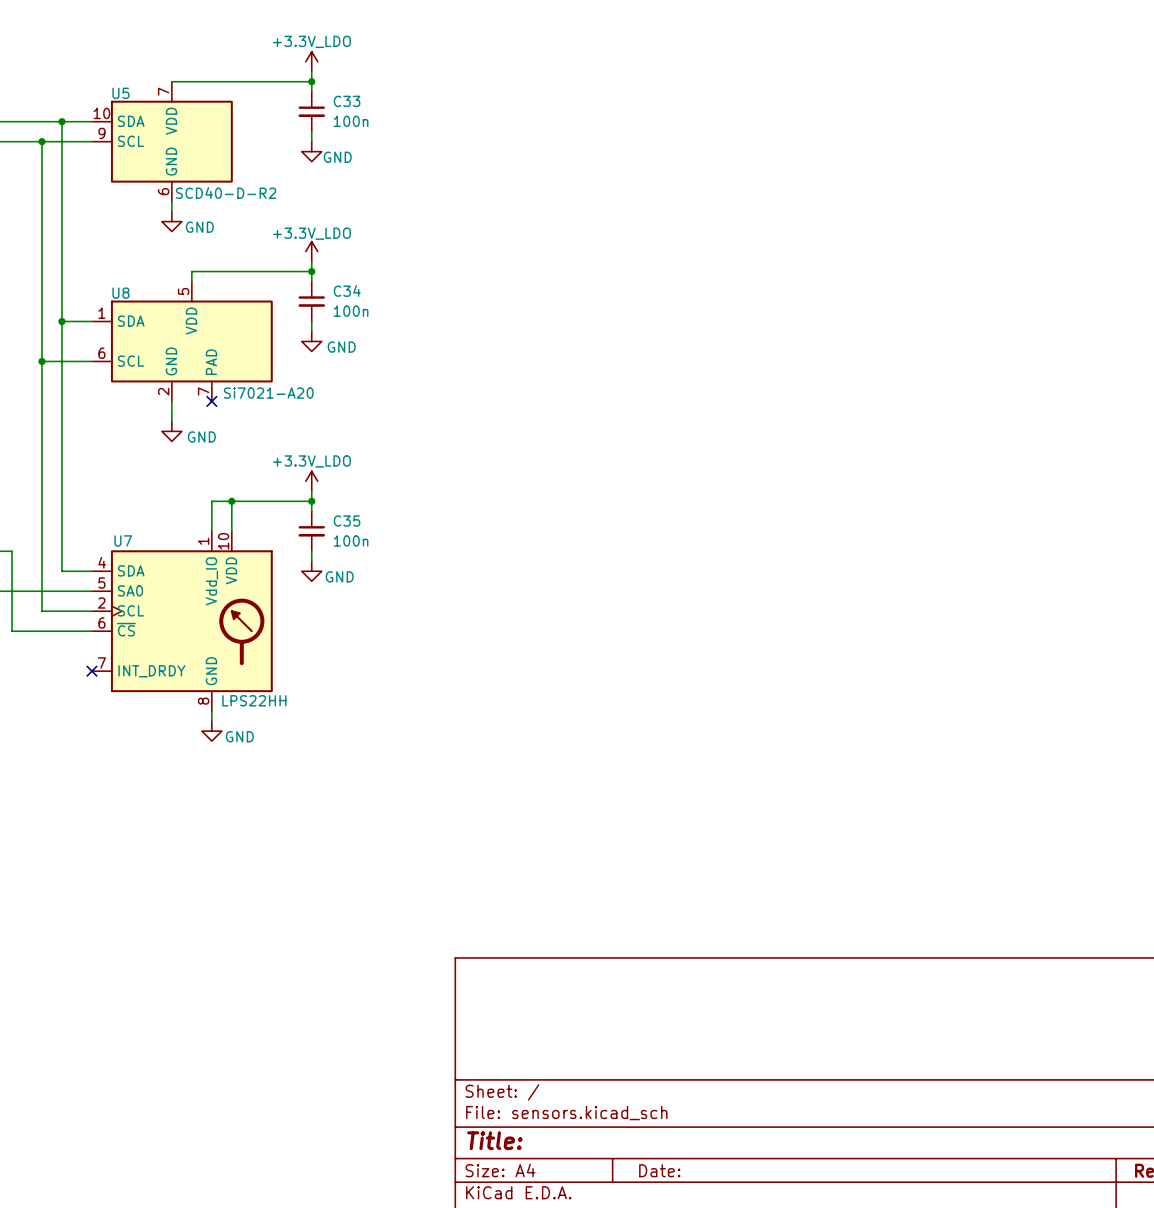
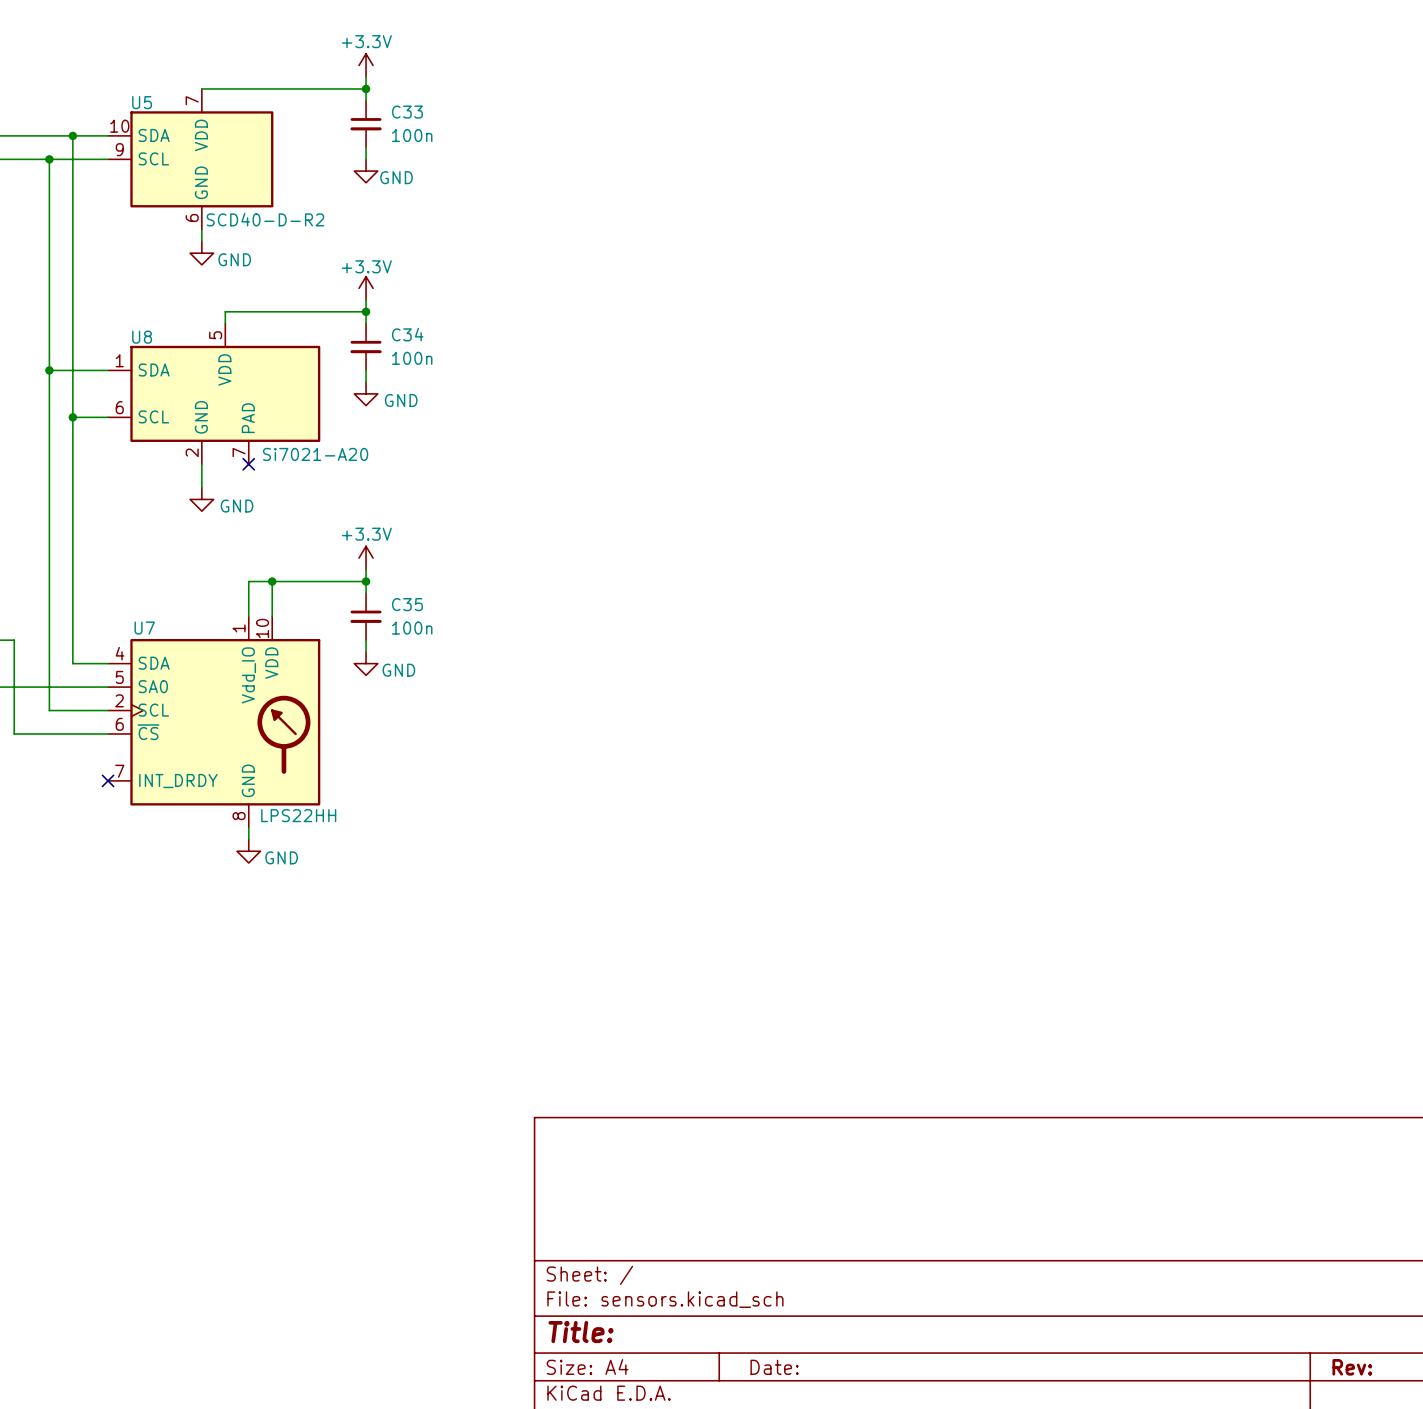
power symbol: +3.3V_LDO (311, 61) -> +3.3V (366, 65)
power symbol: +3.3V_LDO (311, 251) -> +3.3V (366, 288)
junction: none -> (49, 370)
junction: (61, 321) -> none
wire: (42, 361) (61, 361) -> (49, 370) (72, 370)
junction: (42, 361) -> none
junction: none -> (72, 417)
power symbol: +3.3V_LDO (311, 481) -> +3.3V (366, 558)

